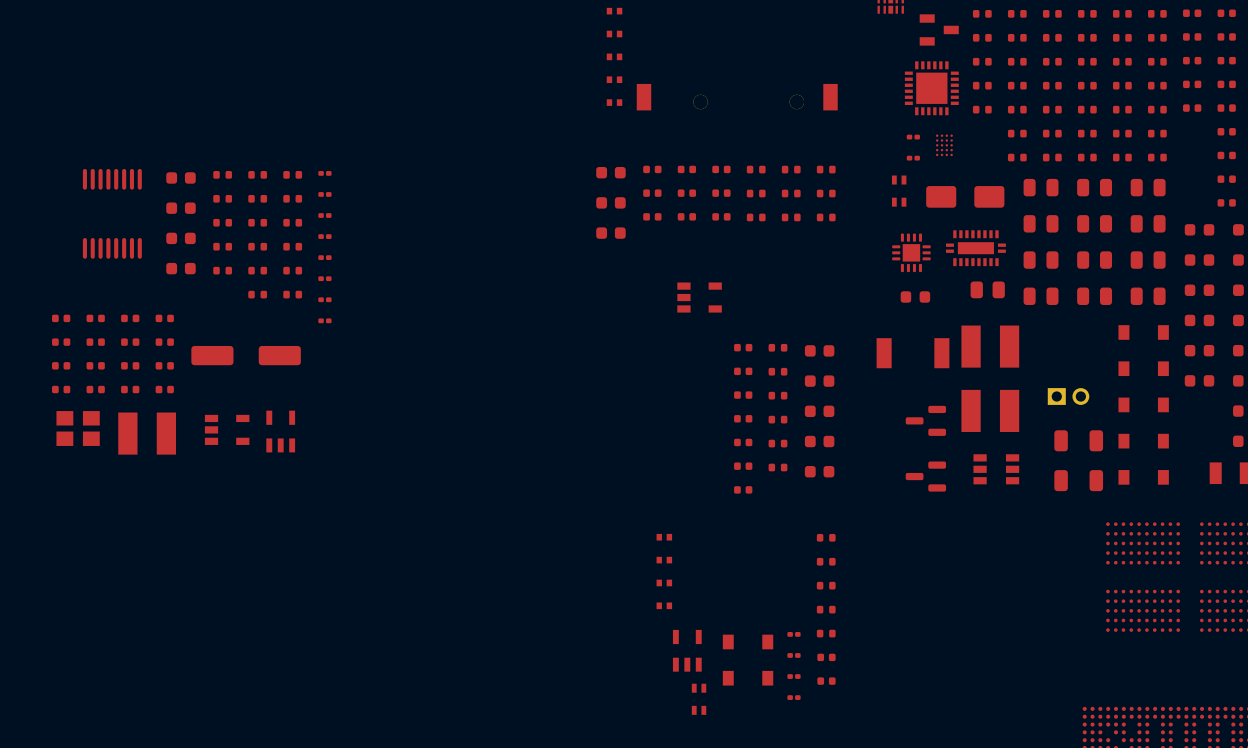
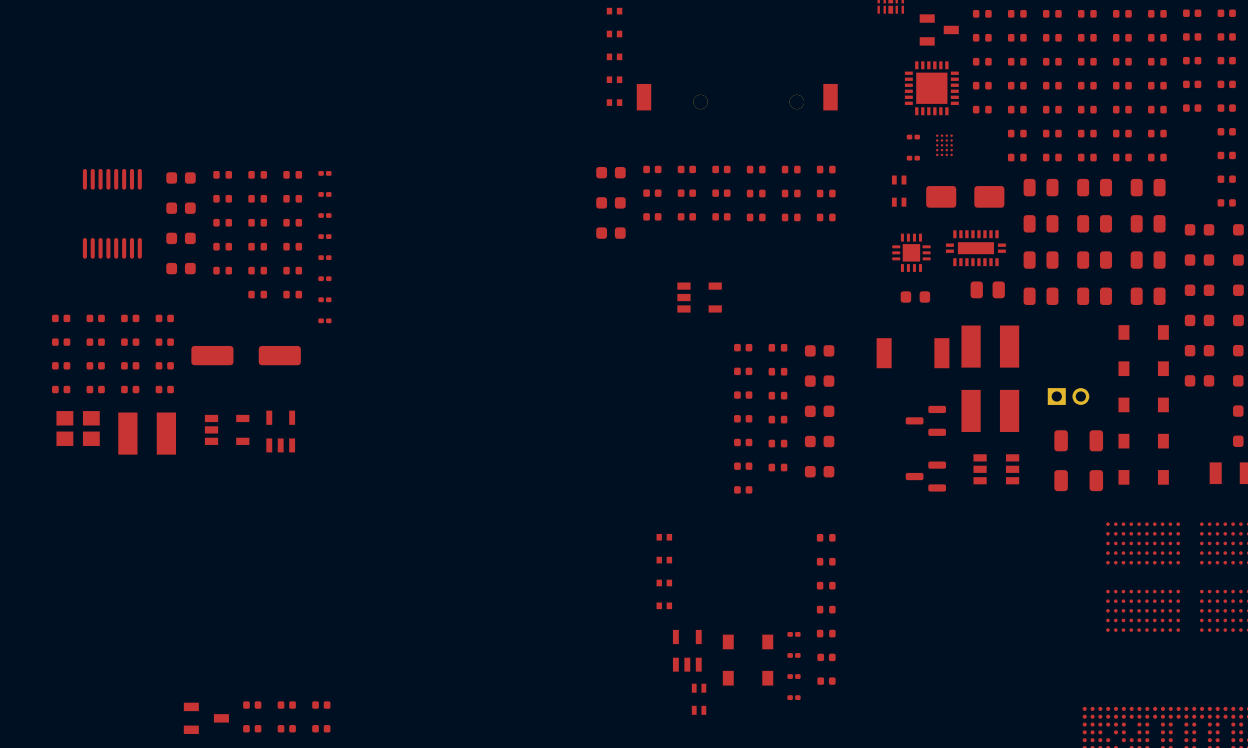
part: none -> (252, 705)
part: none -> (286, 705)
part: none -> (321, 705)
part: none -> (206, 718)
part: none -> (252, 728)
part: none -> (286, 728)
part: none -> (321, 728)

